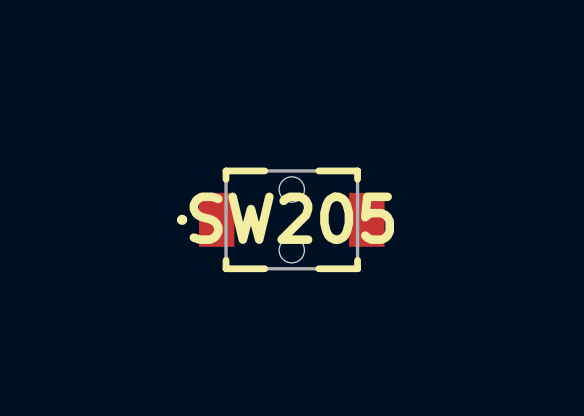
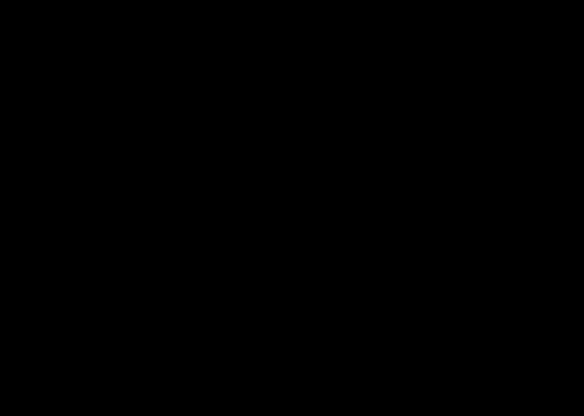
SW205: (280, 219) -> none

